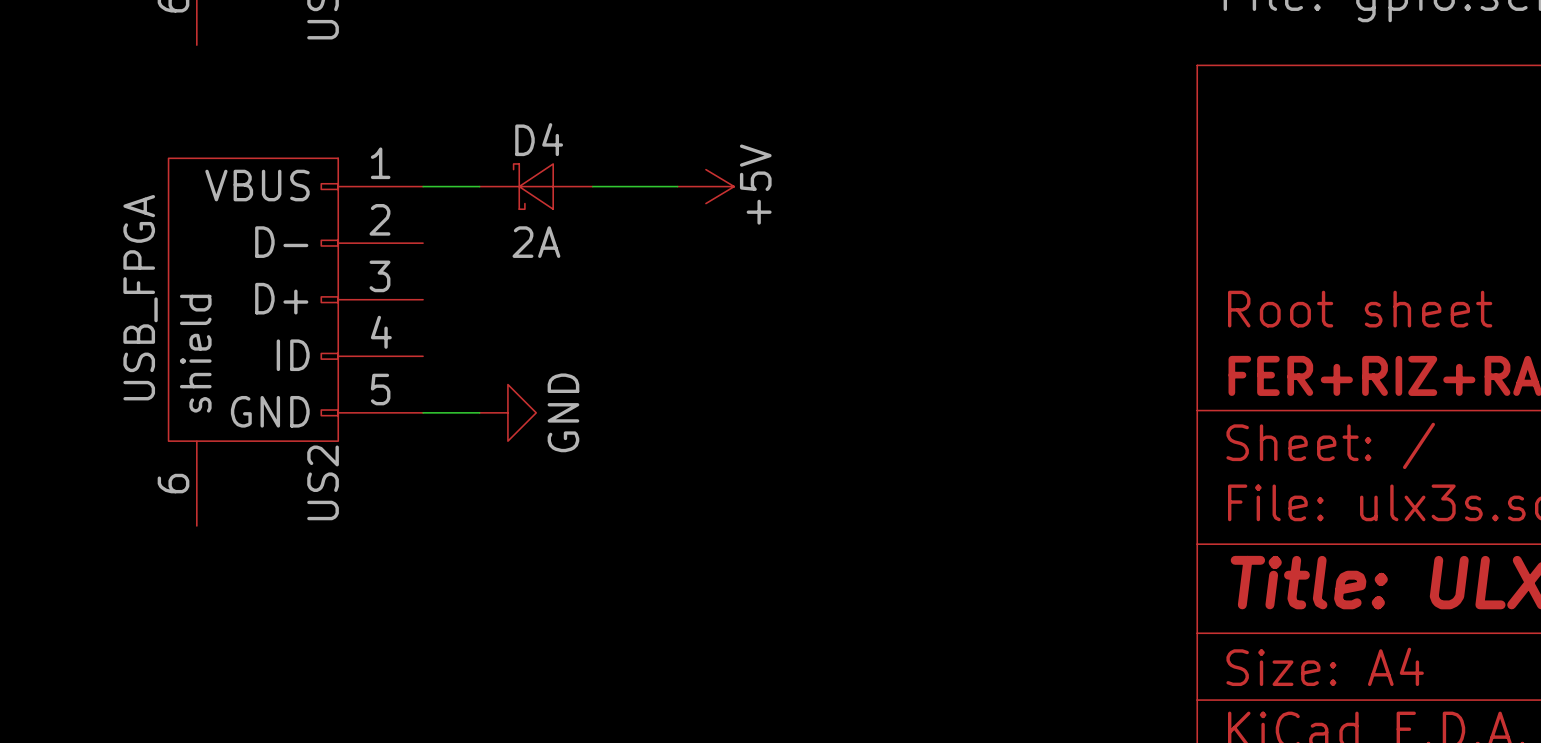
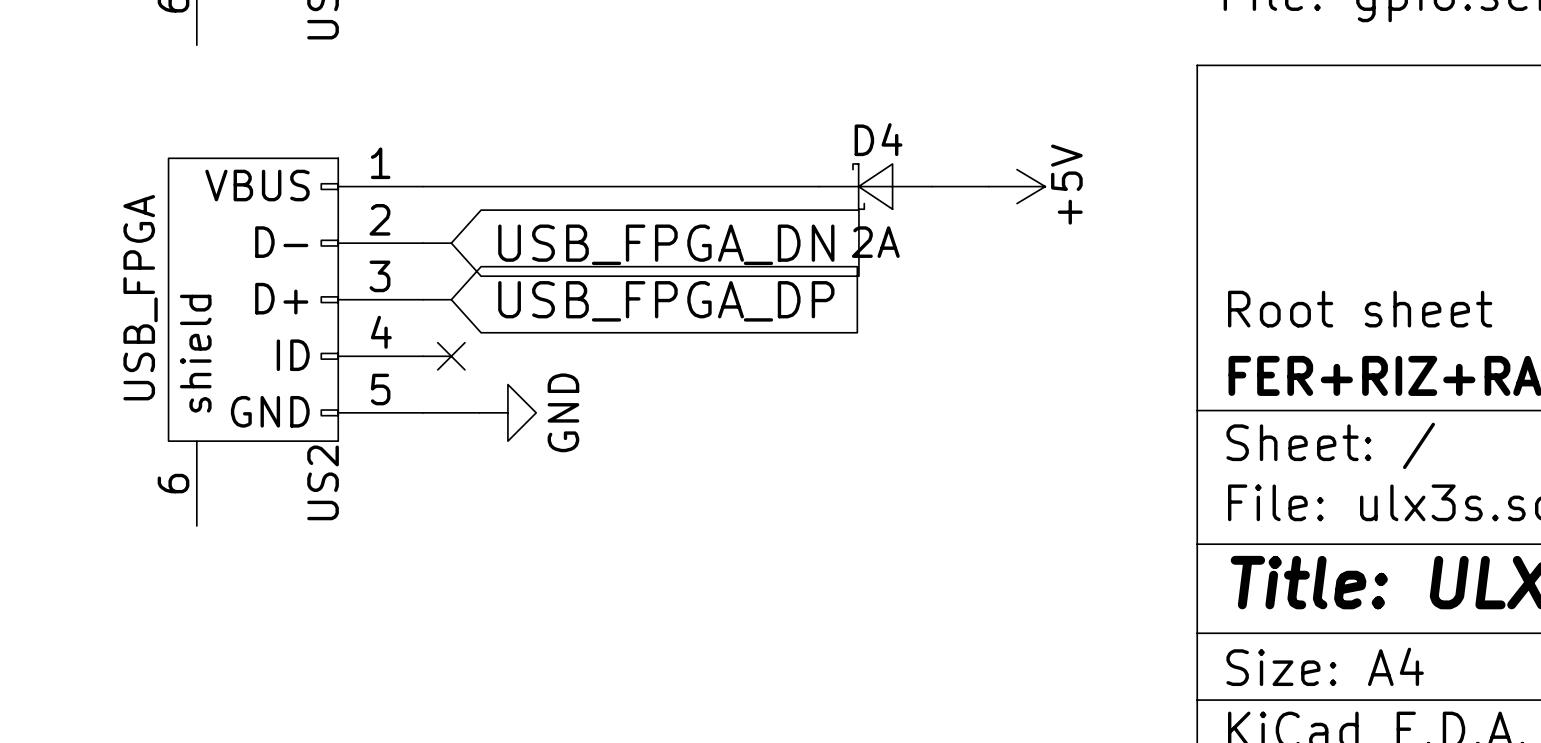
D4 position: (536, 186) -> (875, 186)
wire: none -> (677, 186) (819, 186)
power symbol position: +5V (705, 186) -> +5V (1017, 186)
wire: none -> (932, 186) (988, 186)
wire: none -> (423, 243) (451, 243)
global label: none -> USB_FPGA_DN (666, 244)
wire: none -> (423, 299) (451, 299)
global label: none -> USB_FPGA_DP (666, 301)
wire: none -> (423, 356) (451, 356)
no-connect mark: none -> (451, 356)

